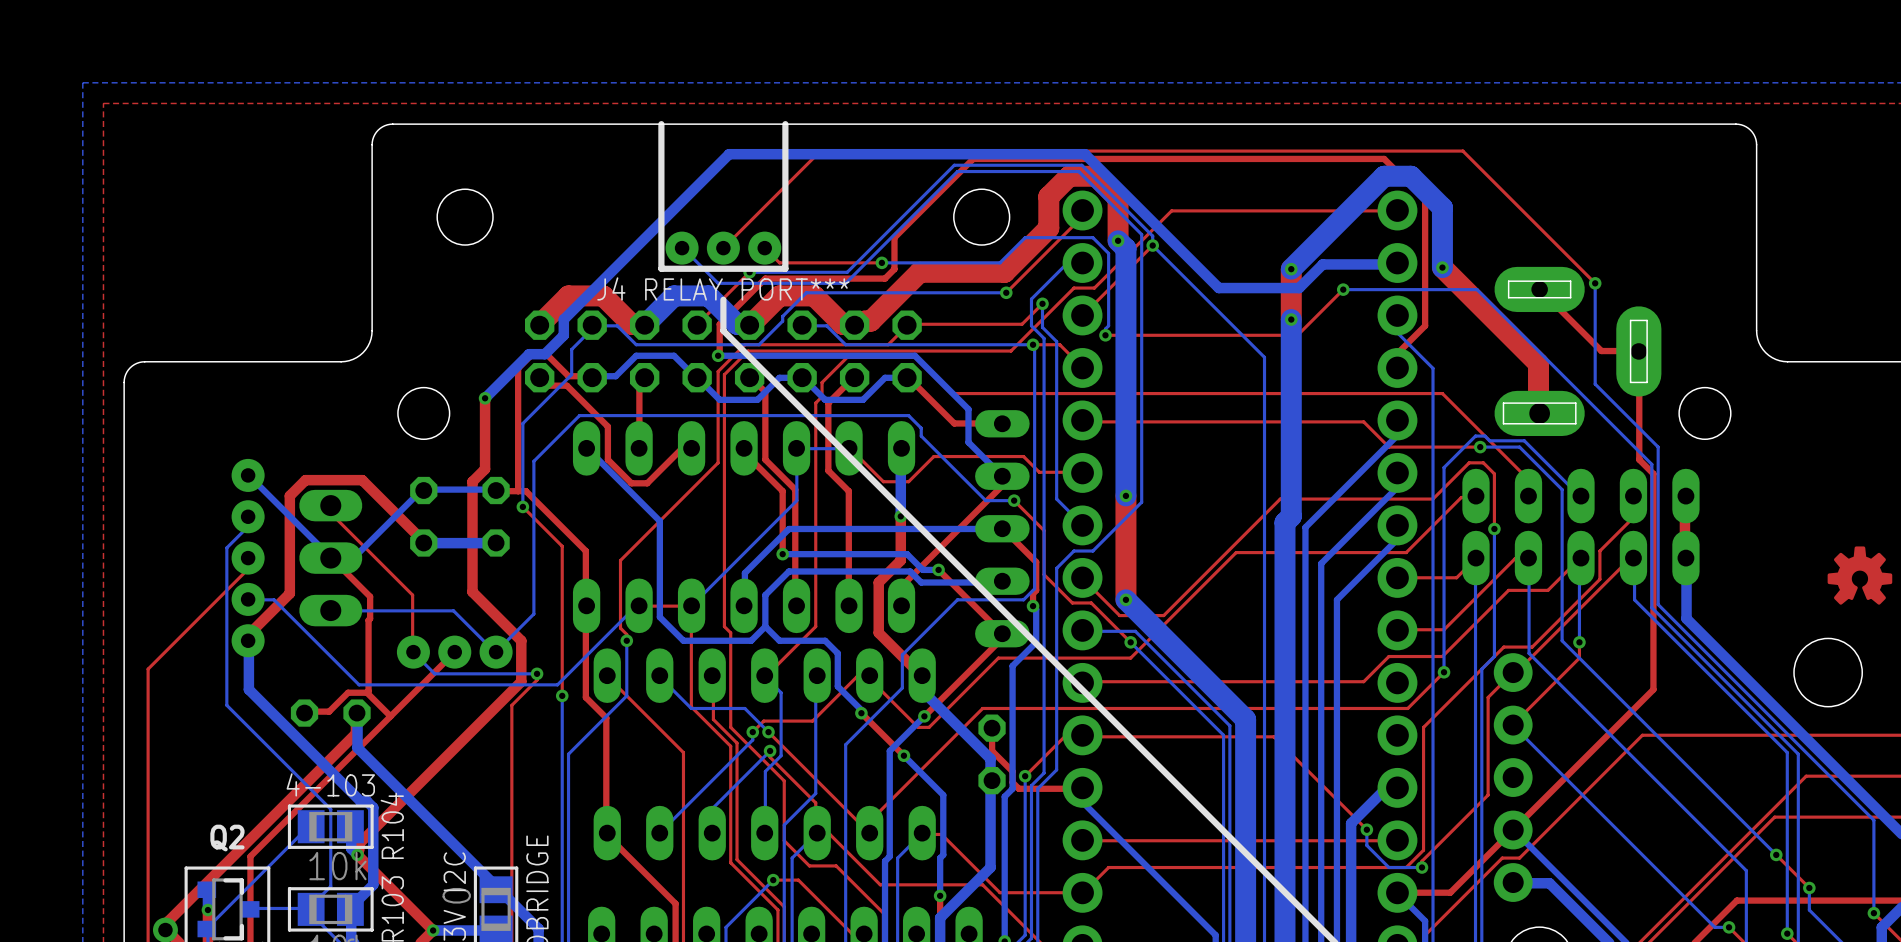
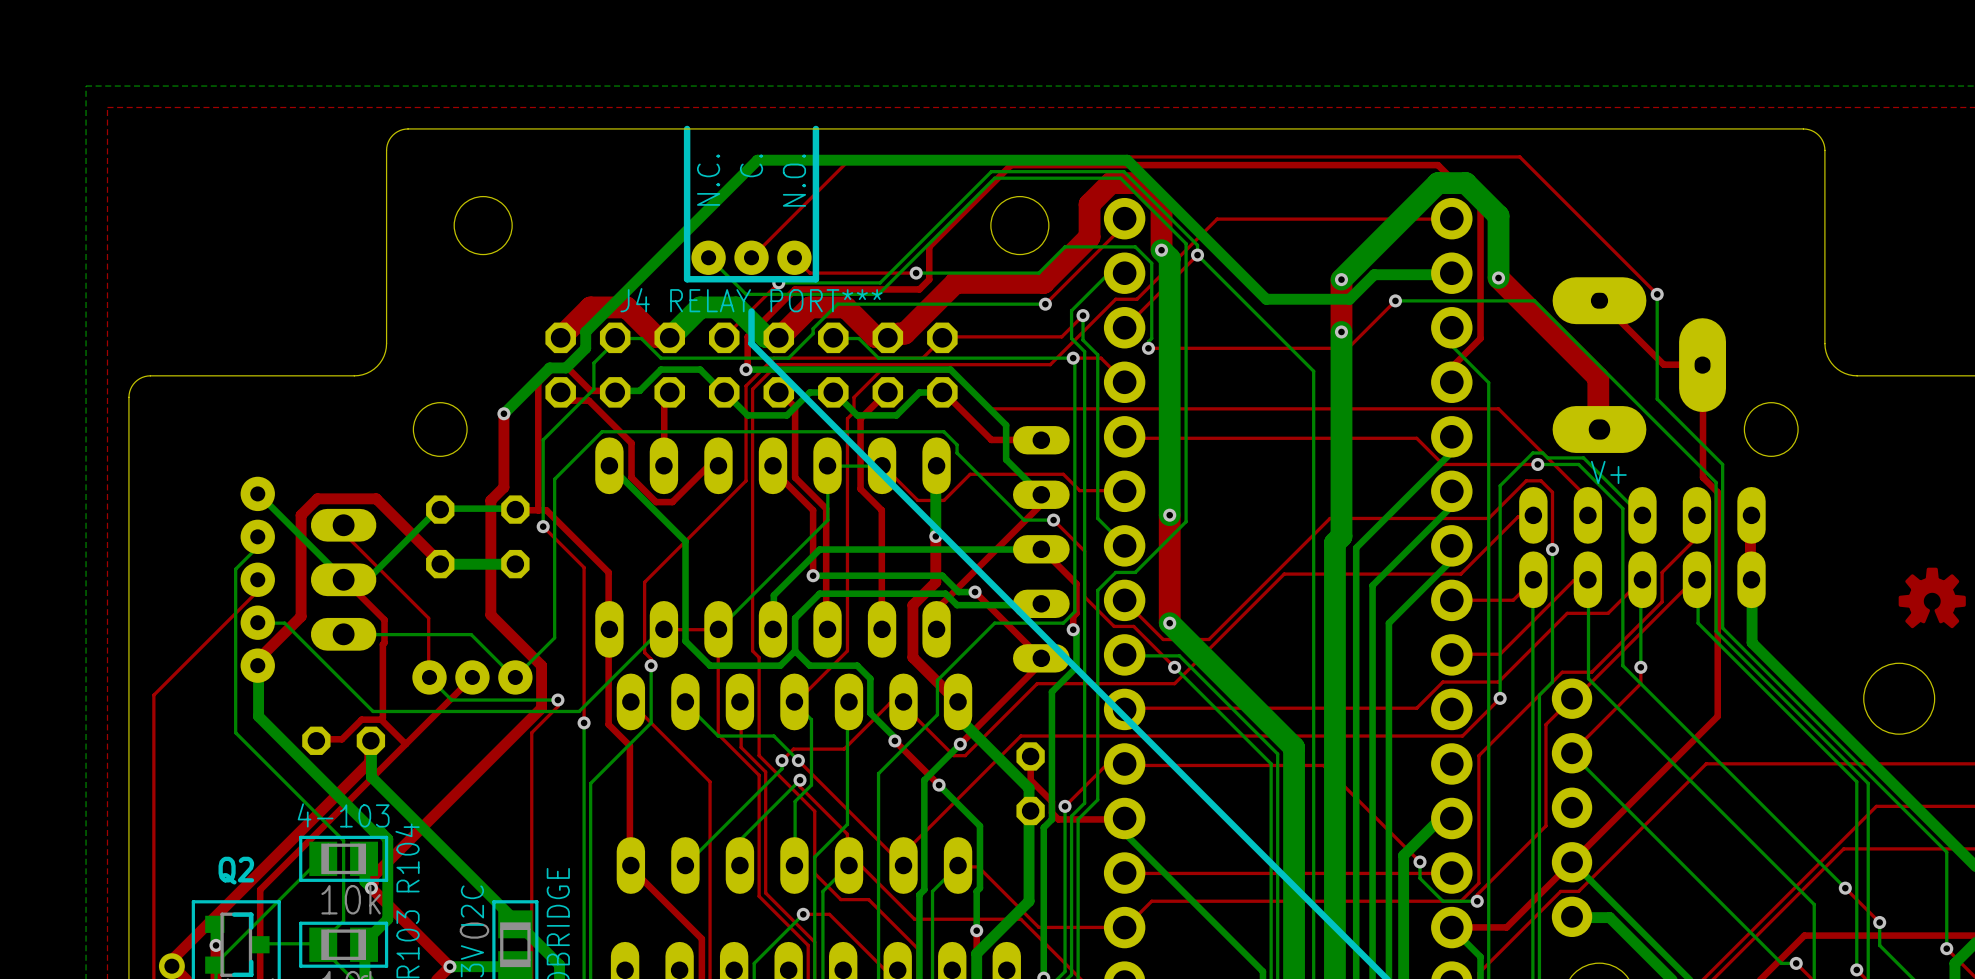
text: none -> C. (751, 165)
text: none -> N.C. (708, 180)
text: none -> N.O. (794, 180)
text: none -> V+ (1608, 472)

